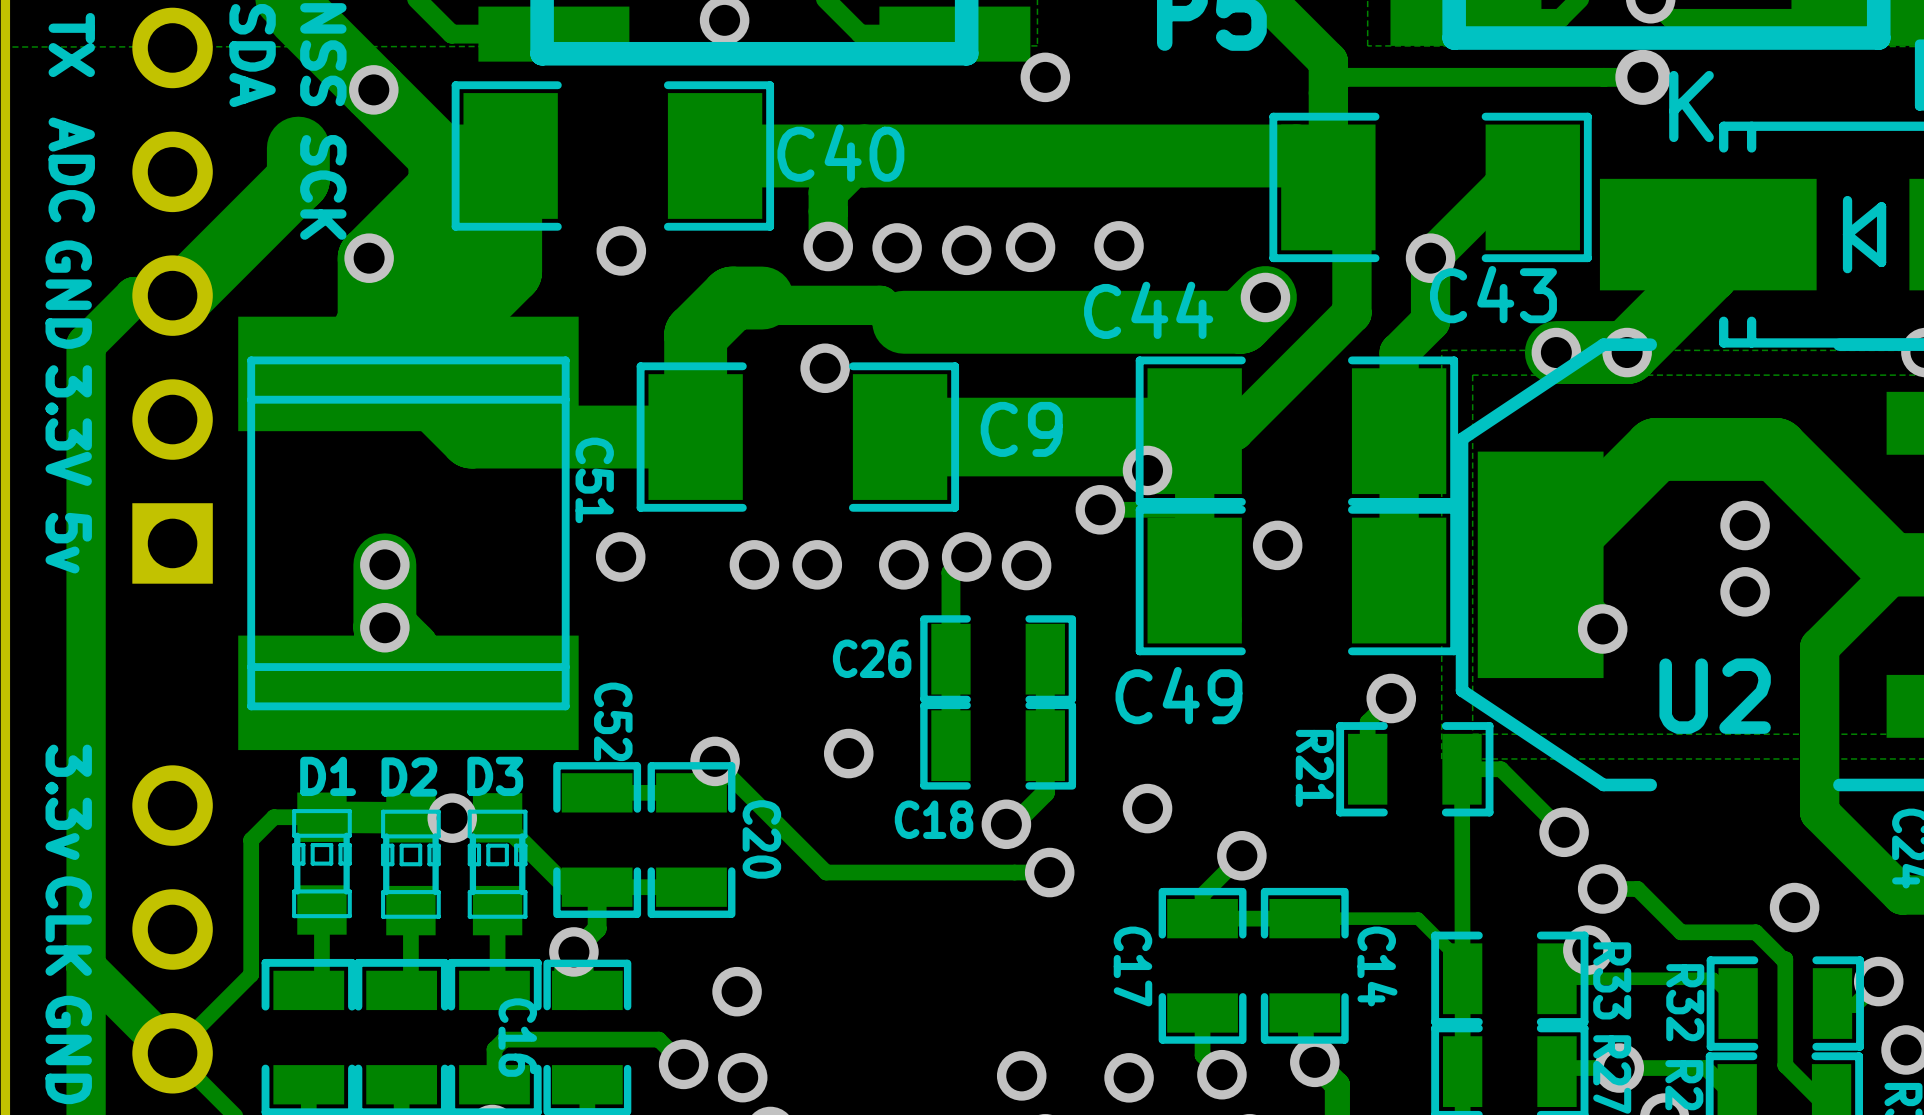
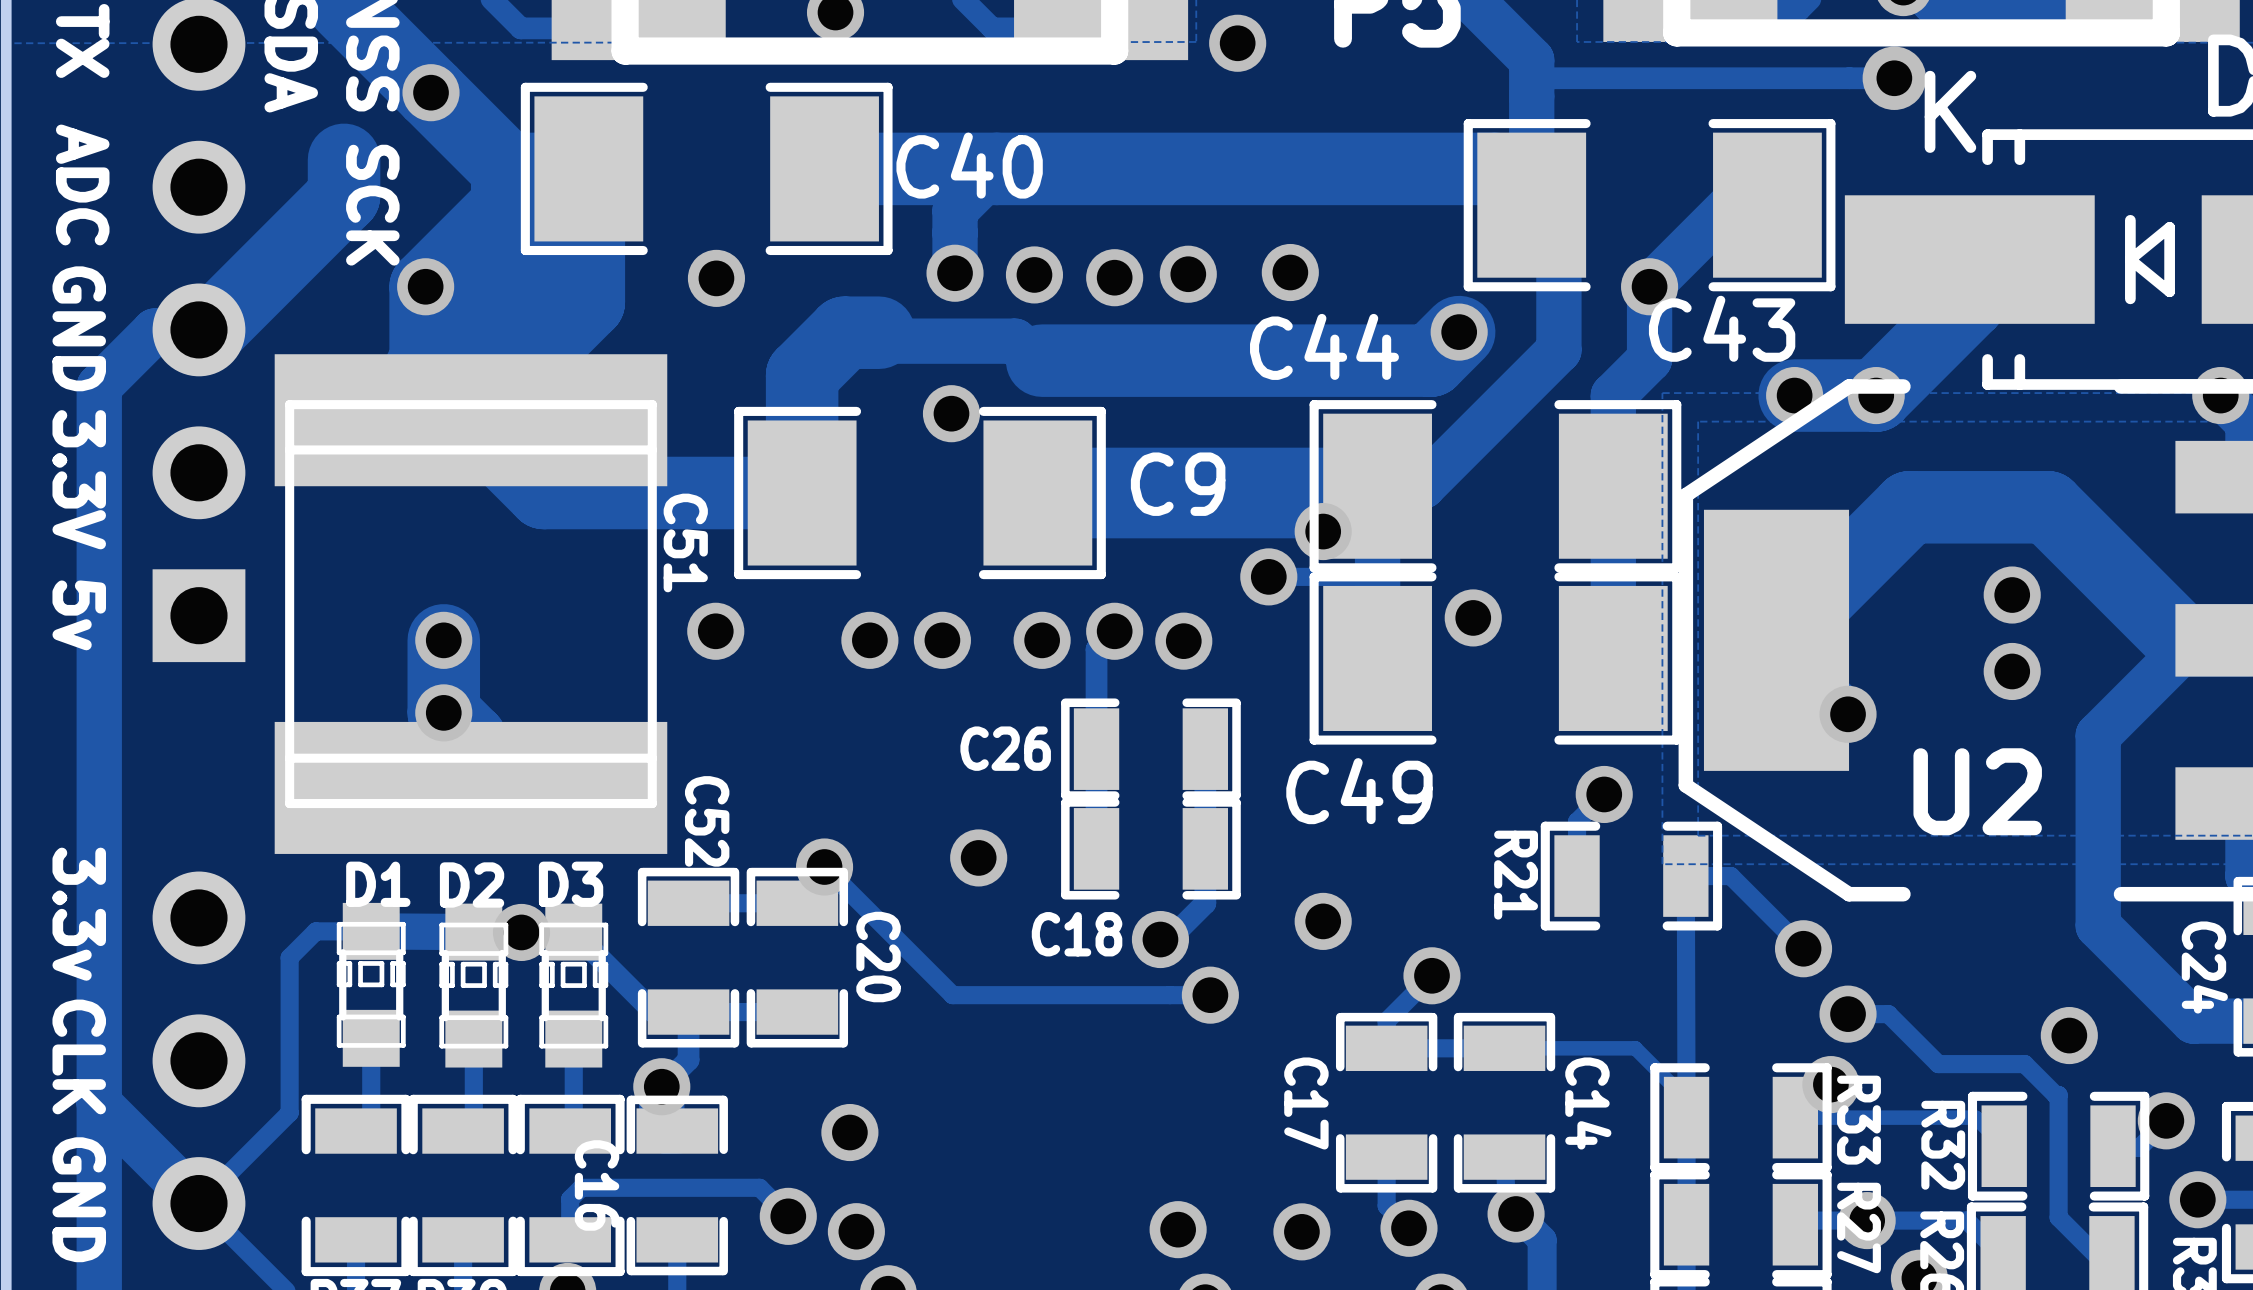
via position: (1045, 77) -> (1237, 43)

